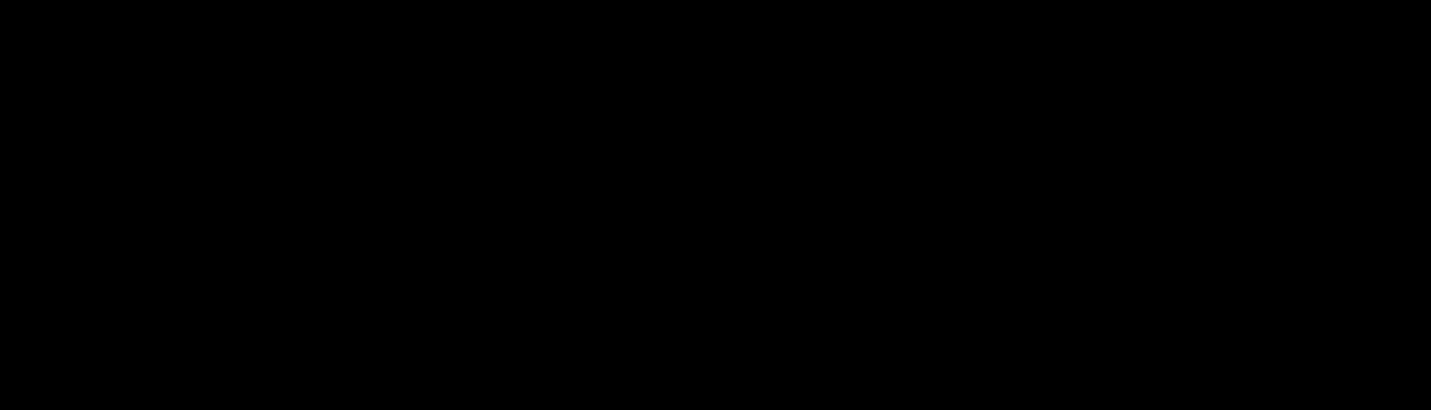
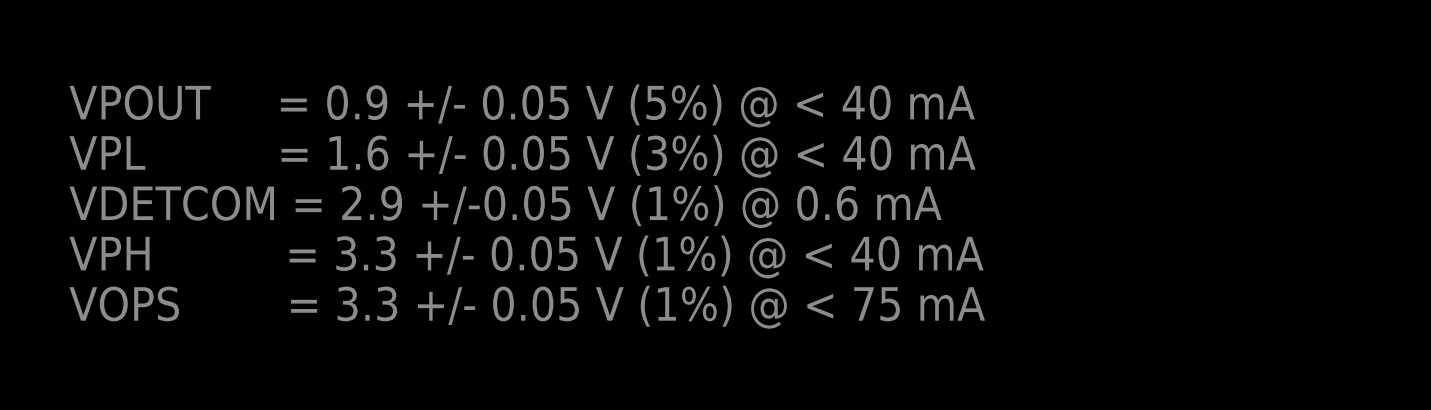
text: none -> VPOUT = 0.9 +/- 0.05 V (5%) @ < 40 mA (522, 105)
text: none -> VPL = 1.6 +/- 0.05 V (3%) @ < 40 mA (522, 156)
text: none -> VDETCOM = 2.9 +/-0.05 V (1%) @ 0.6 mA (505, 206)
text: none -> VPH = 3.3 +/- 0.05 V (1%) @ < 40 mA (526, 256)
text: none -> VOPS = 3.3 +/- 0.05 V (1%) @ < 75 mA (527, 307)

